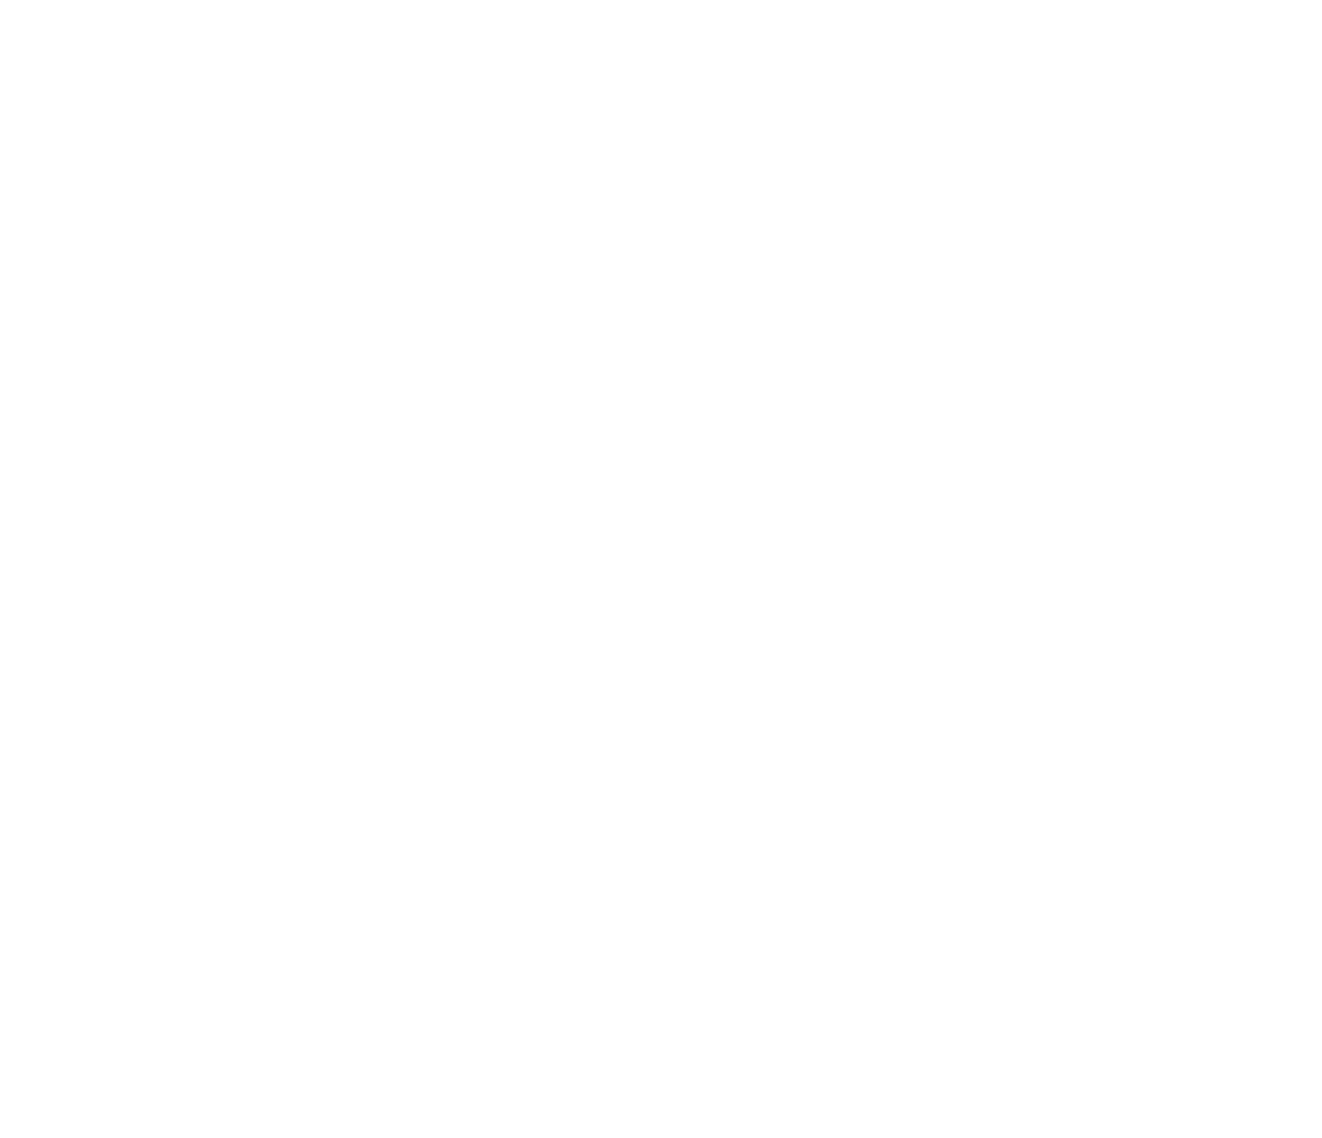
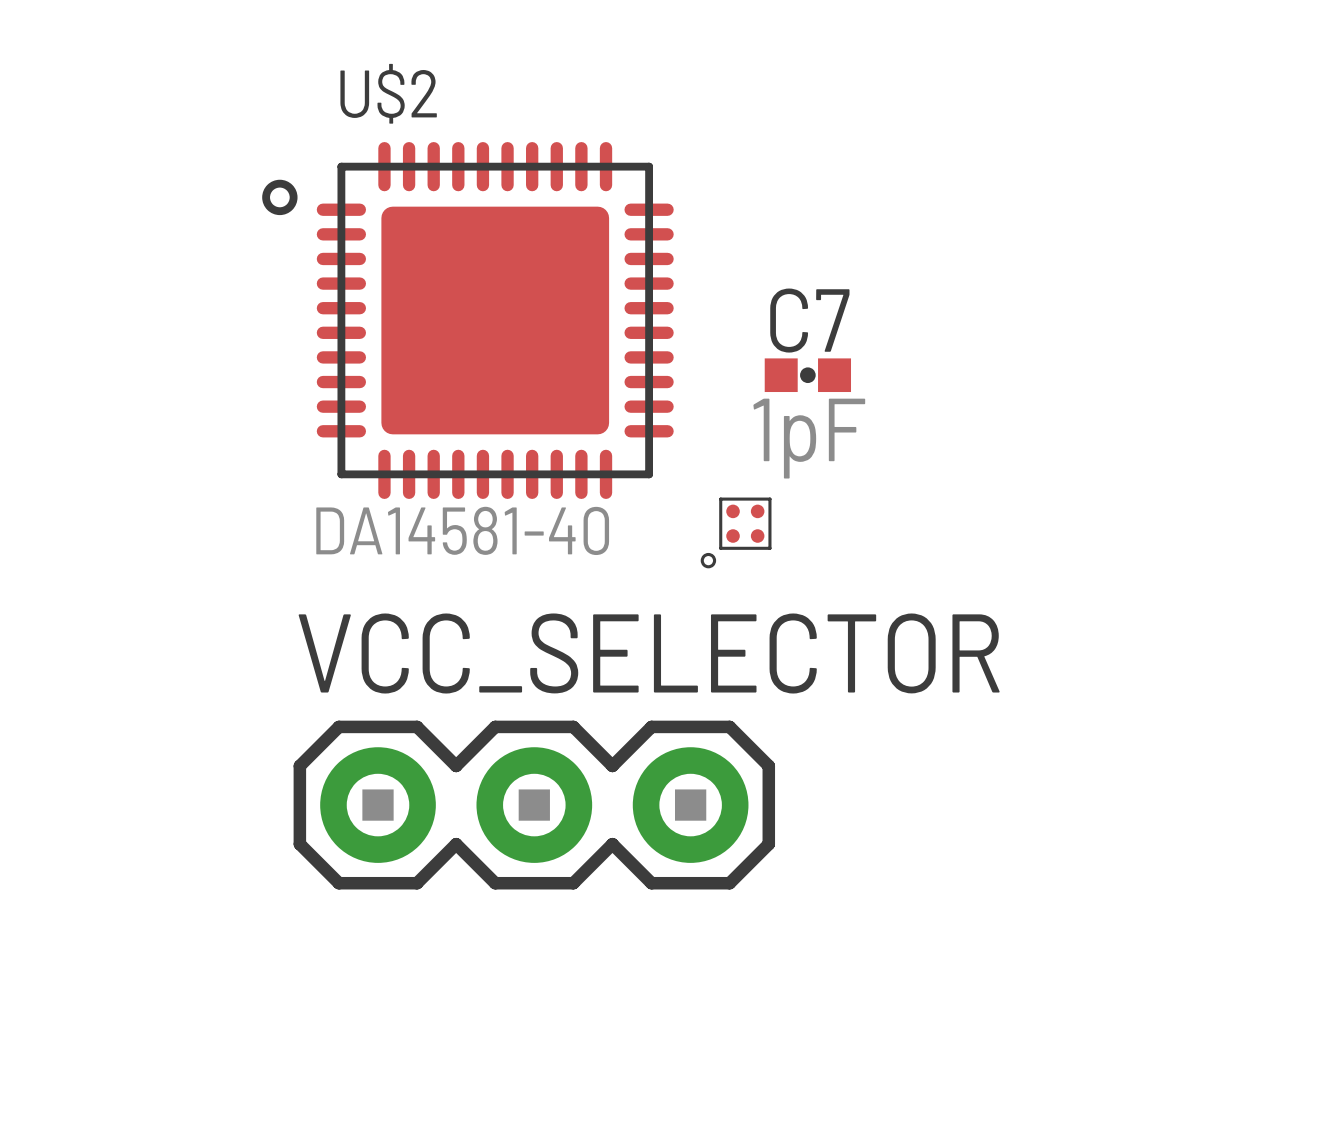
U$2: none -> DA14581-40 (467, 320)
C7: none -> 1pF (807, 375)
part: none -> (736, 532)
VCC_SELECTOR: none -> (534, 805)

